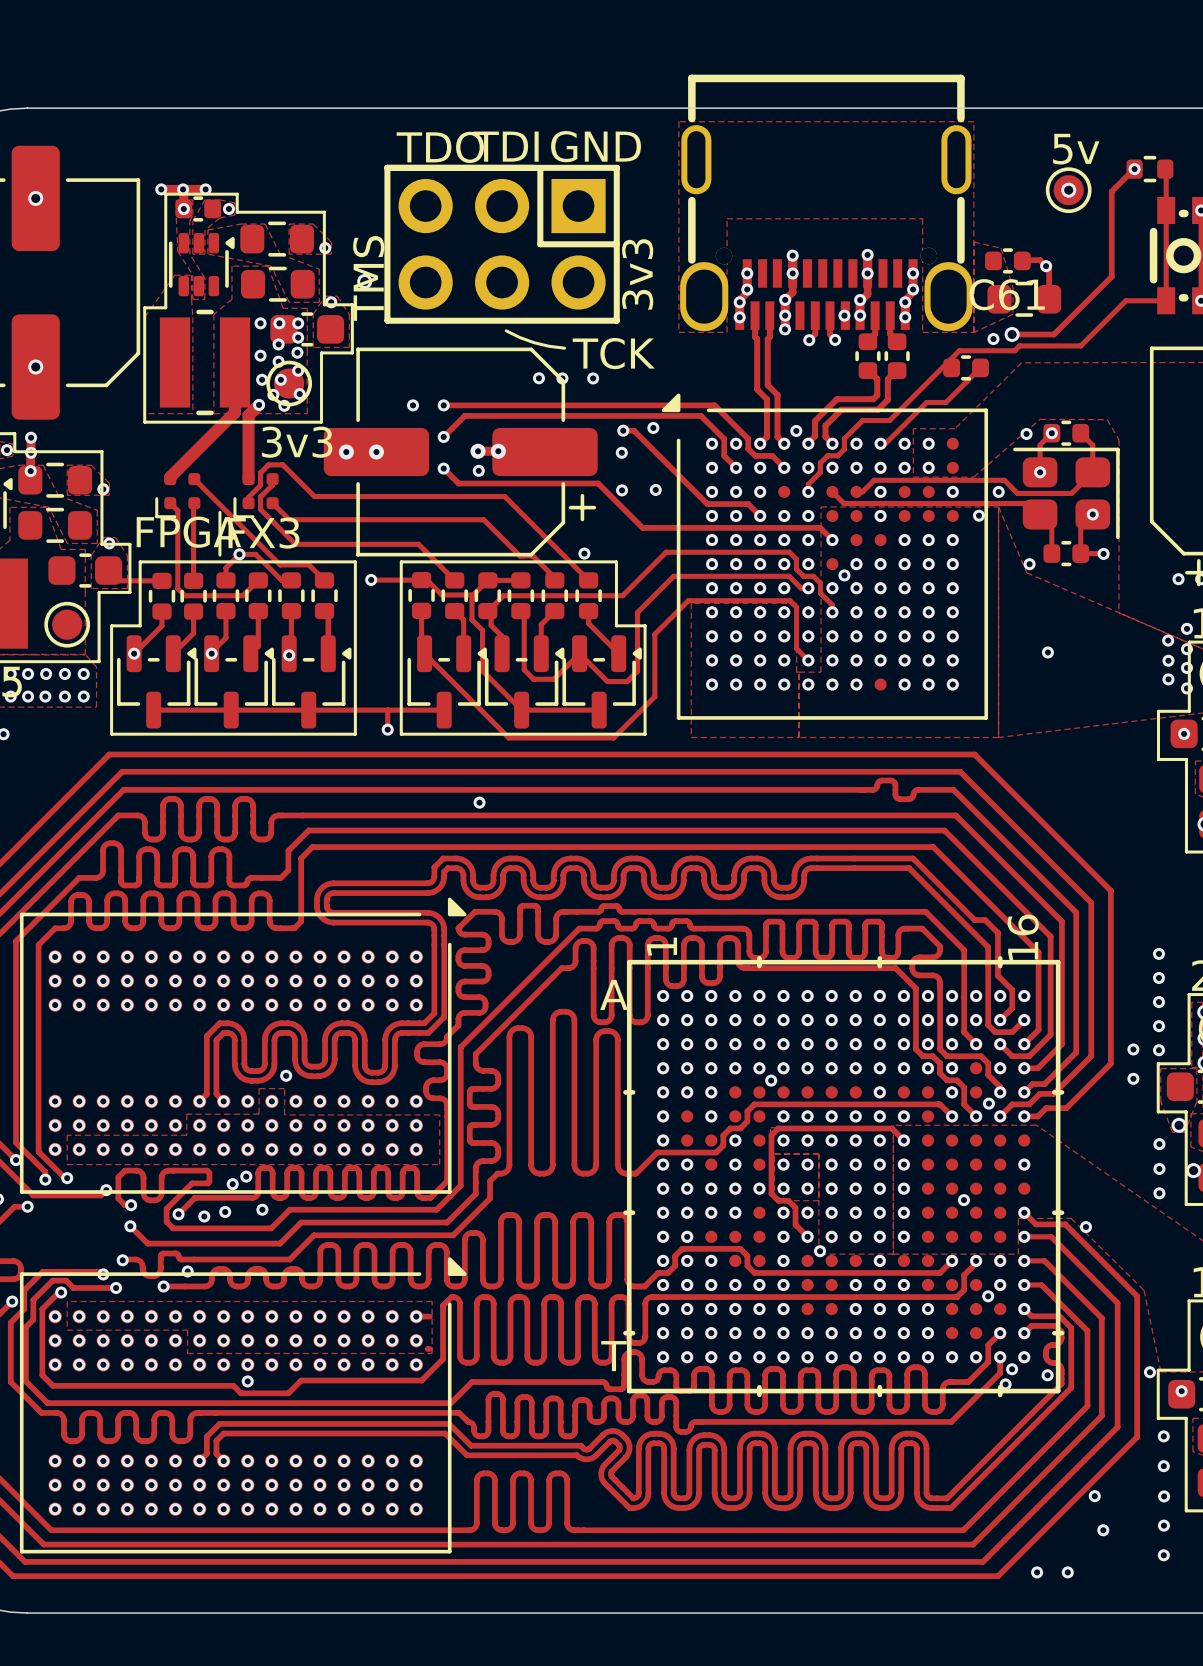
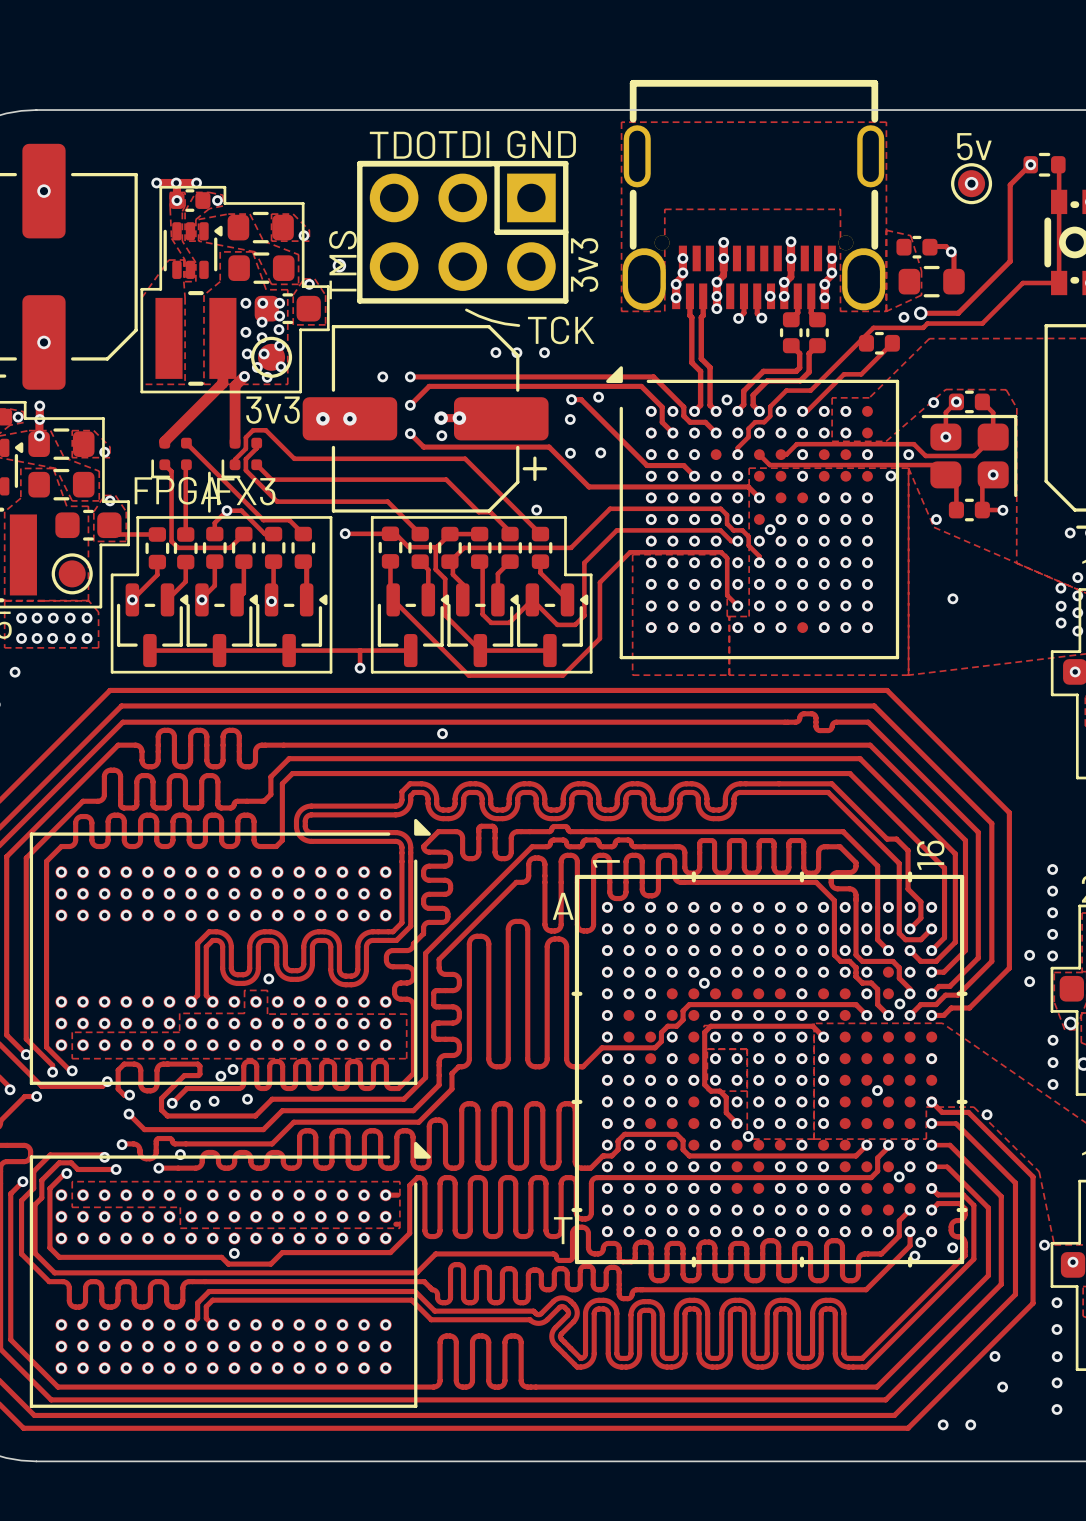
C61 name: C61 (1007, 294) -> none

